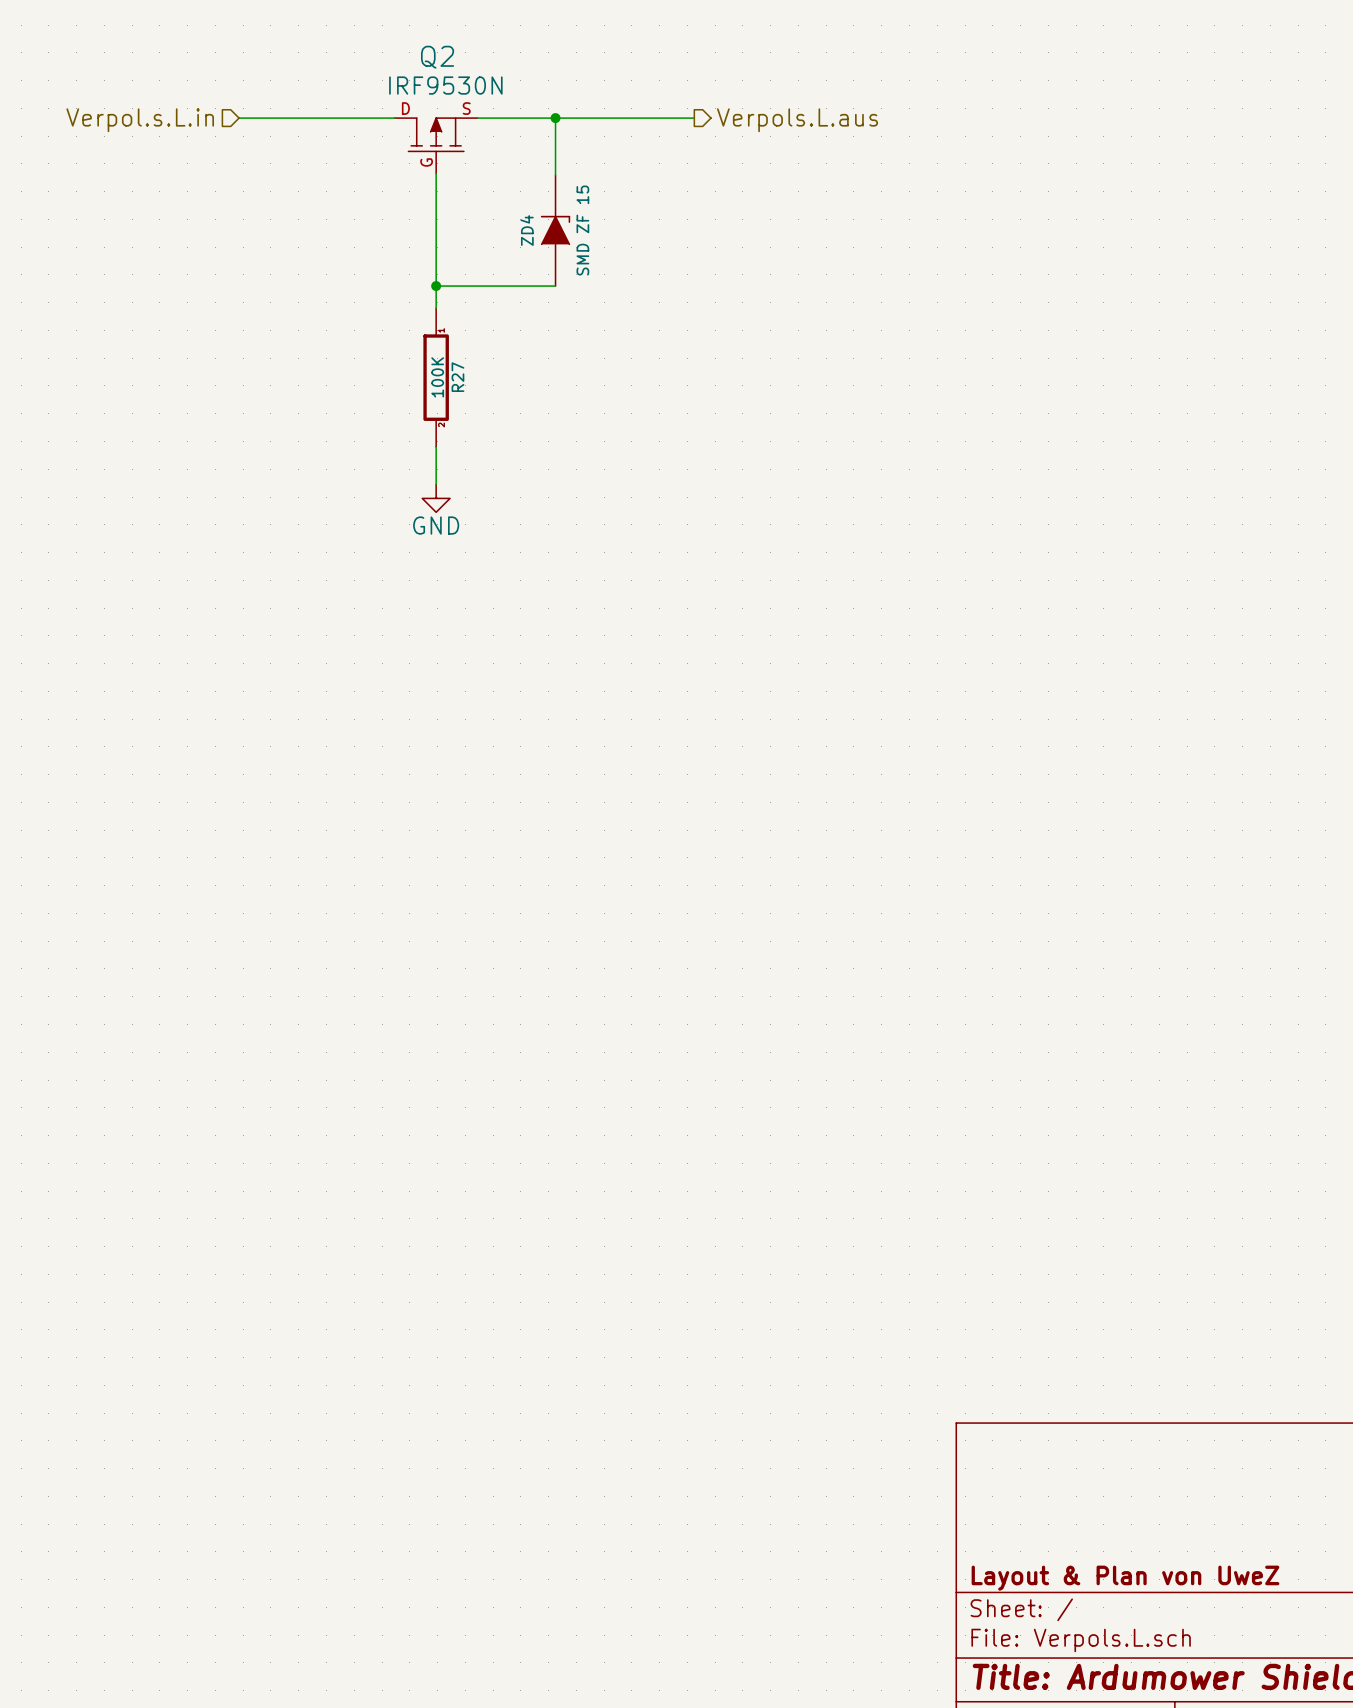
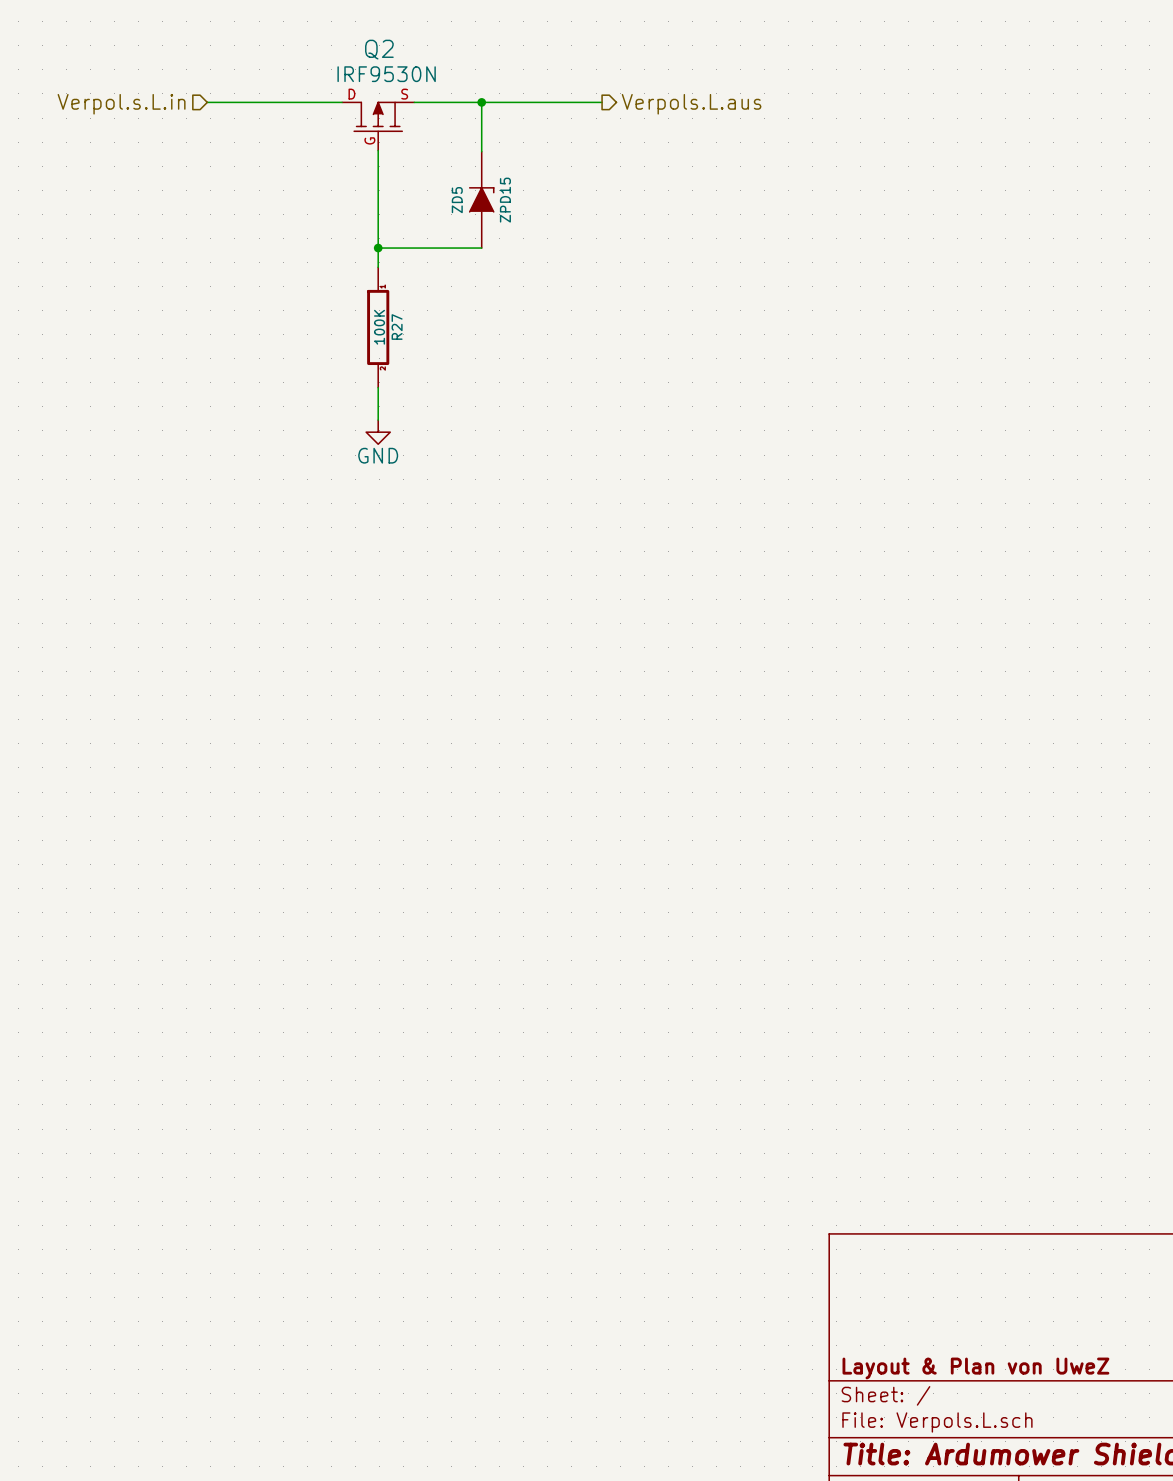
ZD4 name: ZD4 (527, 230) -> ZD5 (457, 200)
ZD4 value: SMD ZF 15 (582, 230) -> ZPD15 (505, 200)

